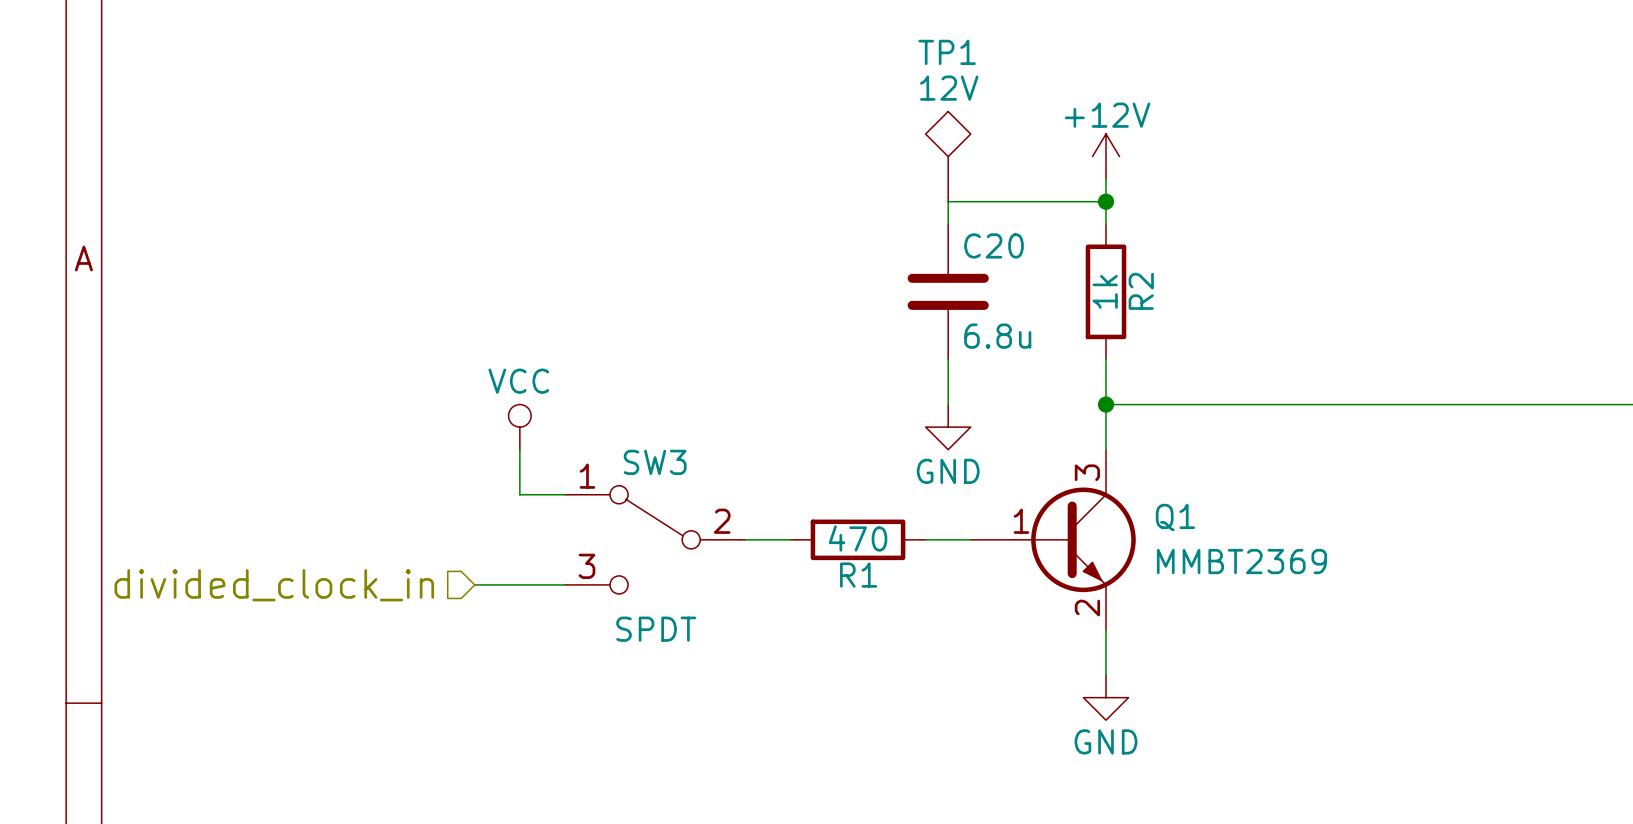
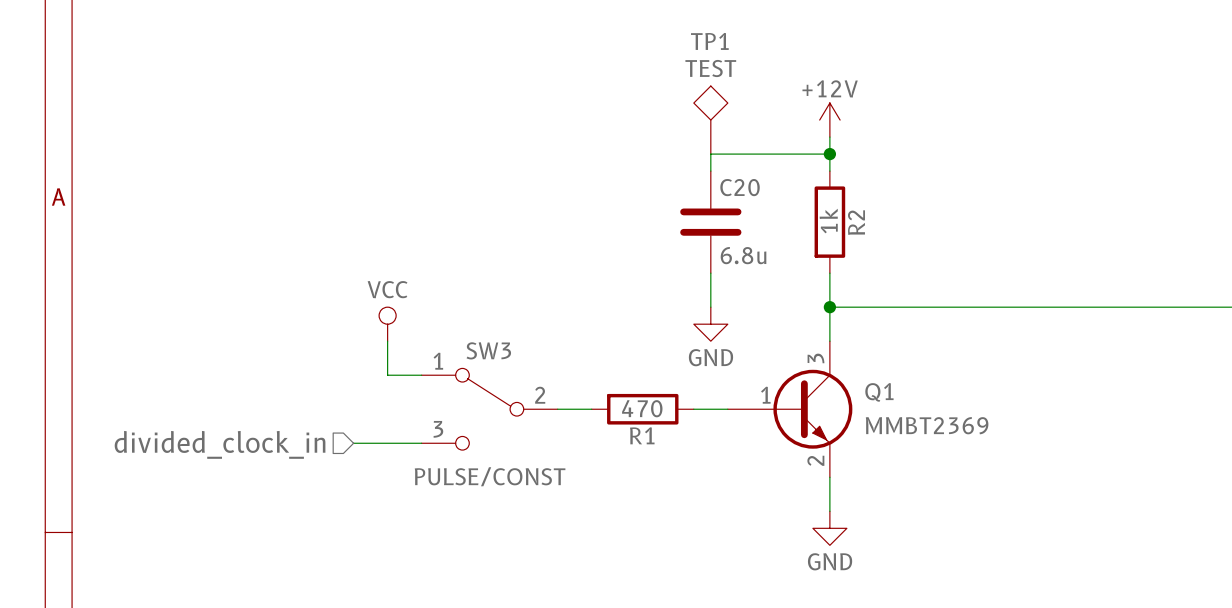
TP1 value: 12V (949, 88) -> TEST (710, 68)
SW3 value: SPDT (656, 629) -> PULSE/CONST (490, 476)

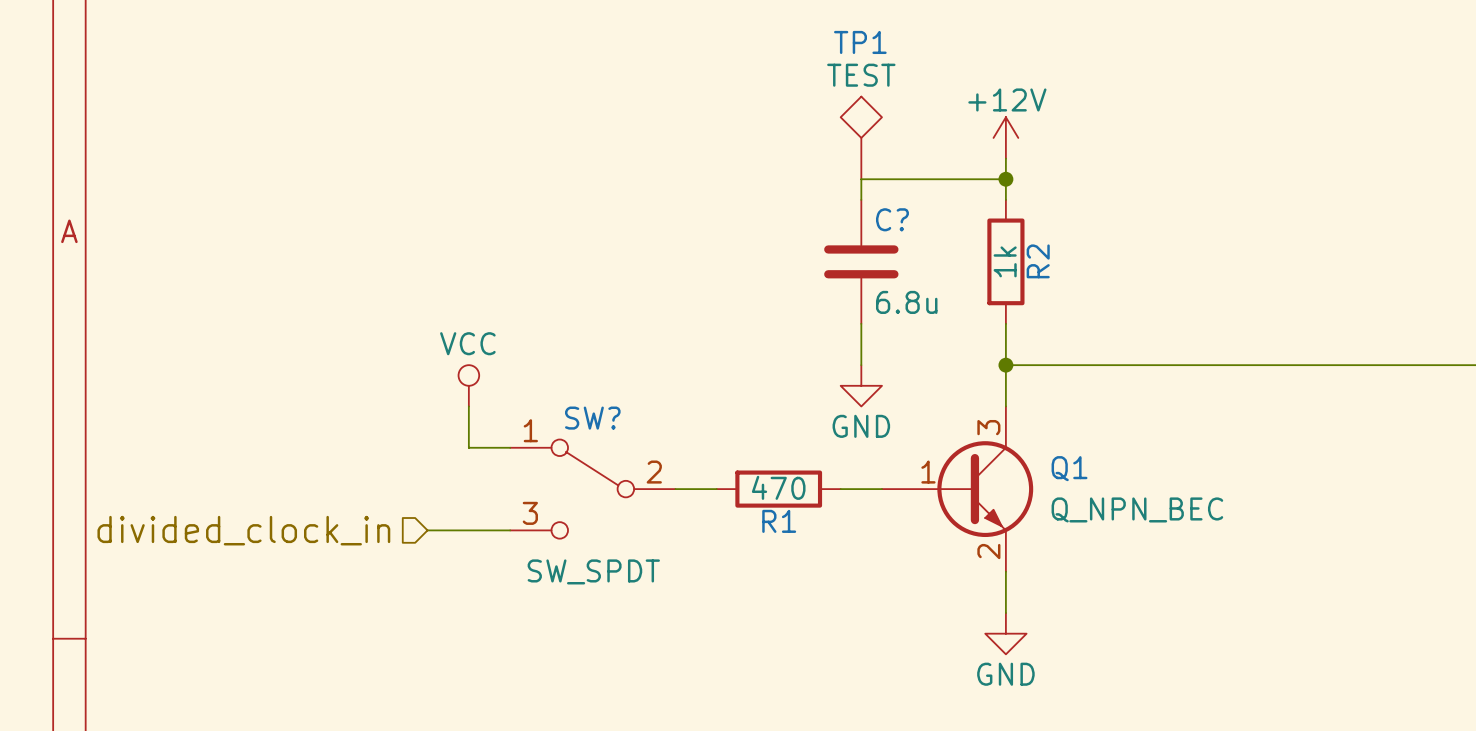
C20 name: C20 (740, 187) -> C? (892, 219)
SW3 name: SW3 (488, 350) -> SW? (592, 418)
Q1 value: MMBT2369 (927, 425) -> Q_NPN_BEC (1137, 509)
SW3 value: PULSE/CONST (490, 476) -> SW_SPDT (593, 571)

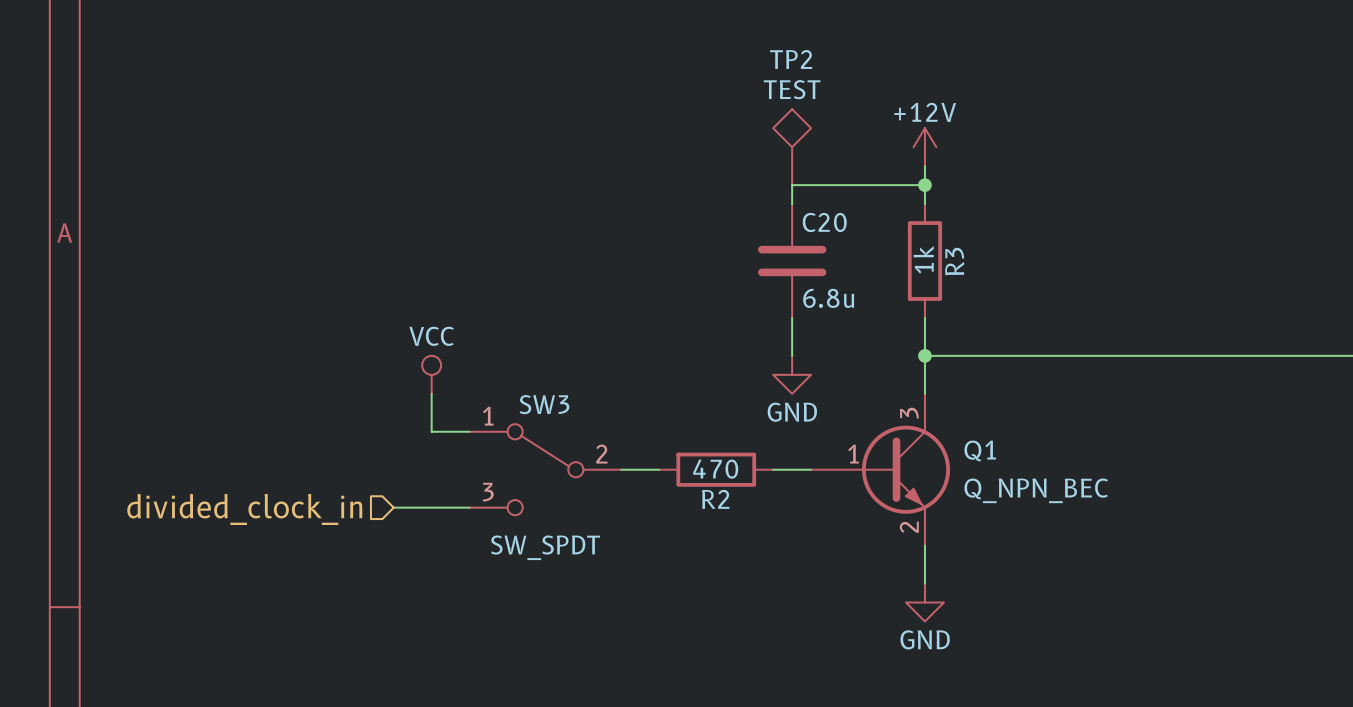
TP1 name: TP1 (860, 42) -> TP2 (791, 59)
C? name: C? (892, 219) -> C20 (824, 222)
R2 name: R2 (1038, 261) -> R3 (954, 261)
SW? name: SW? (592, 418) -> SW3 (544, 404)
R1 name: R1 (779, 521) -> R2 (715, 499)

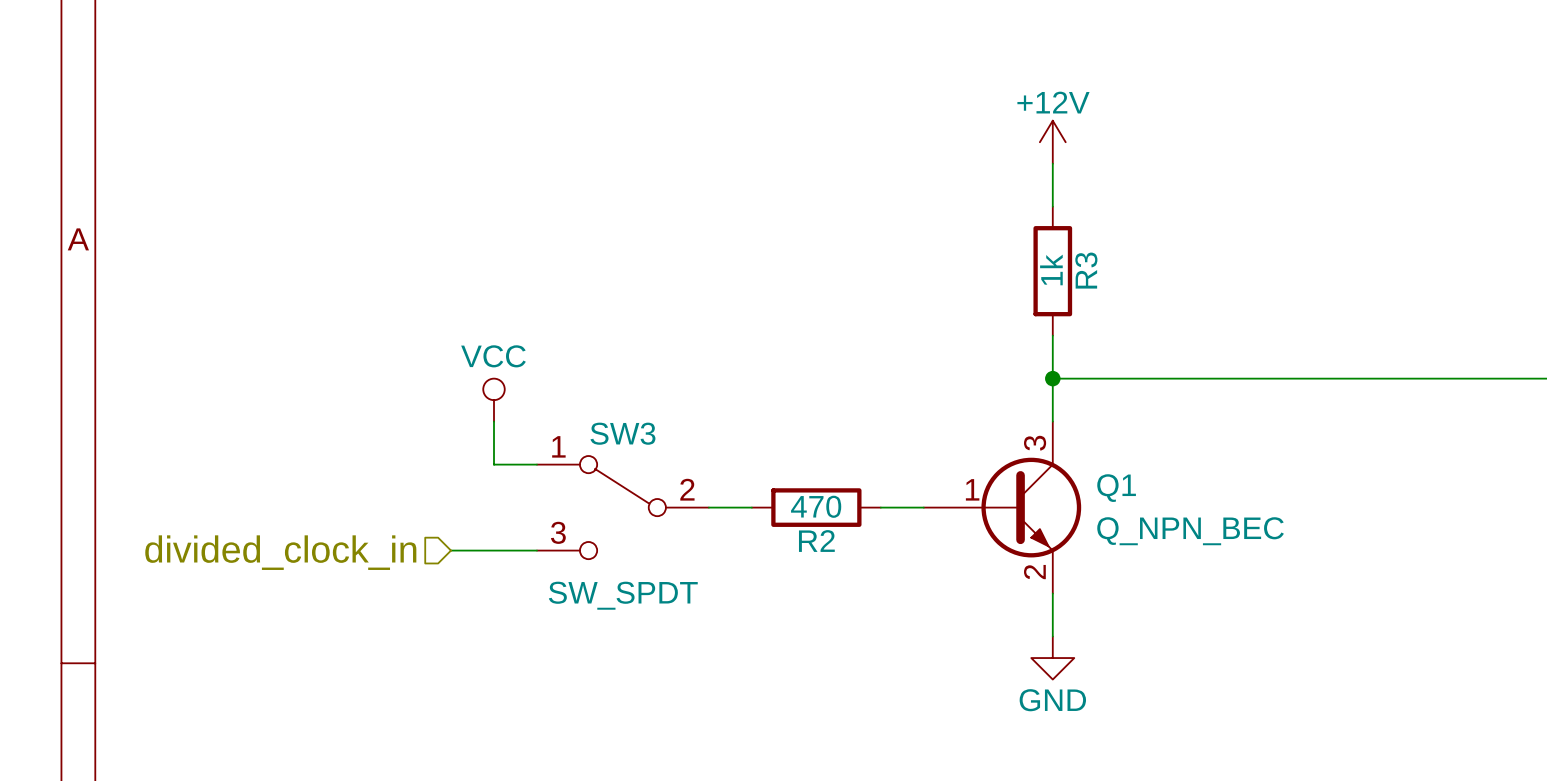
TP2: TEST (792, 147) -> none
wire: (924, 185) (792, 185) (792, 204) -> none
junction: (924, 185) -> none
C20: 6.8u (792, 261) -> none
wire: (792, 317) (792, 355) -> none
power symbol: GND (792, 374) -> none

